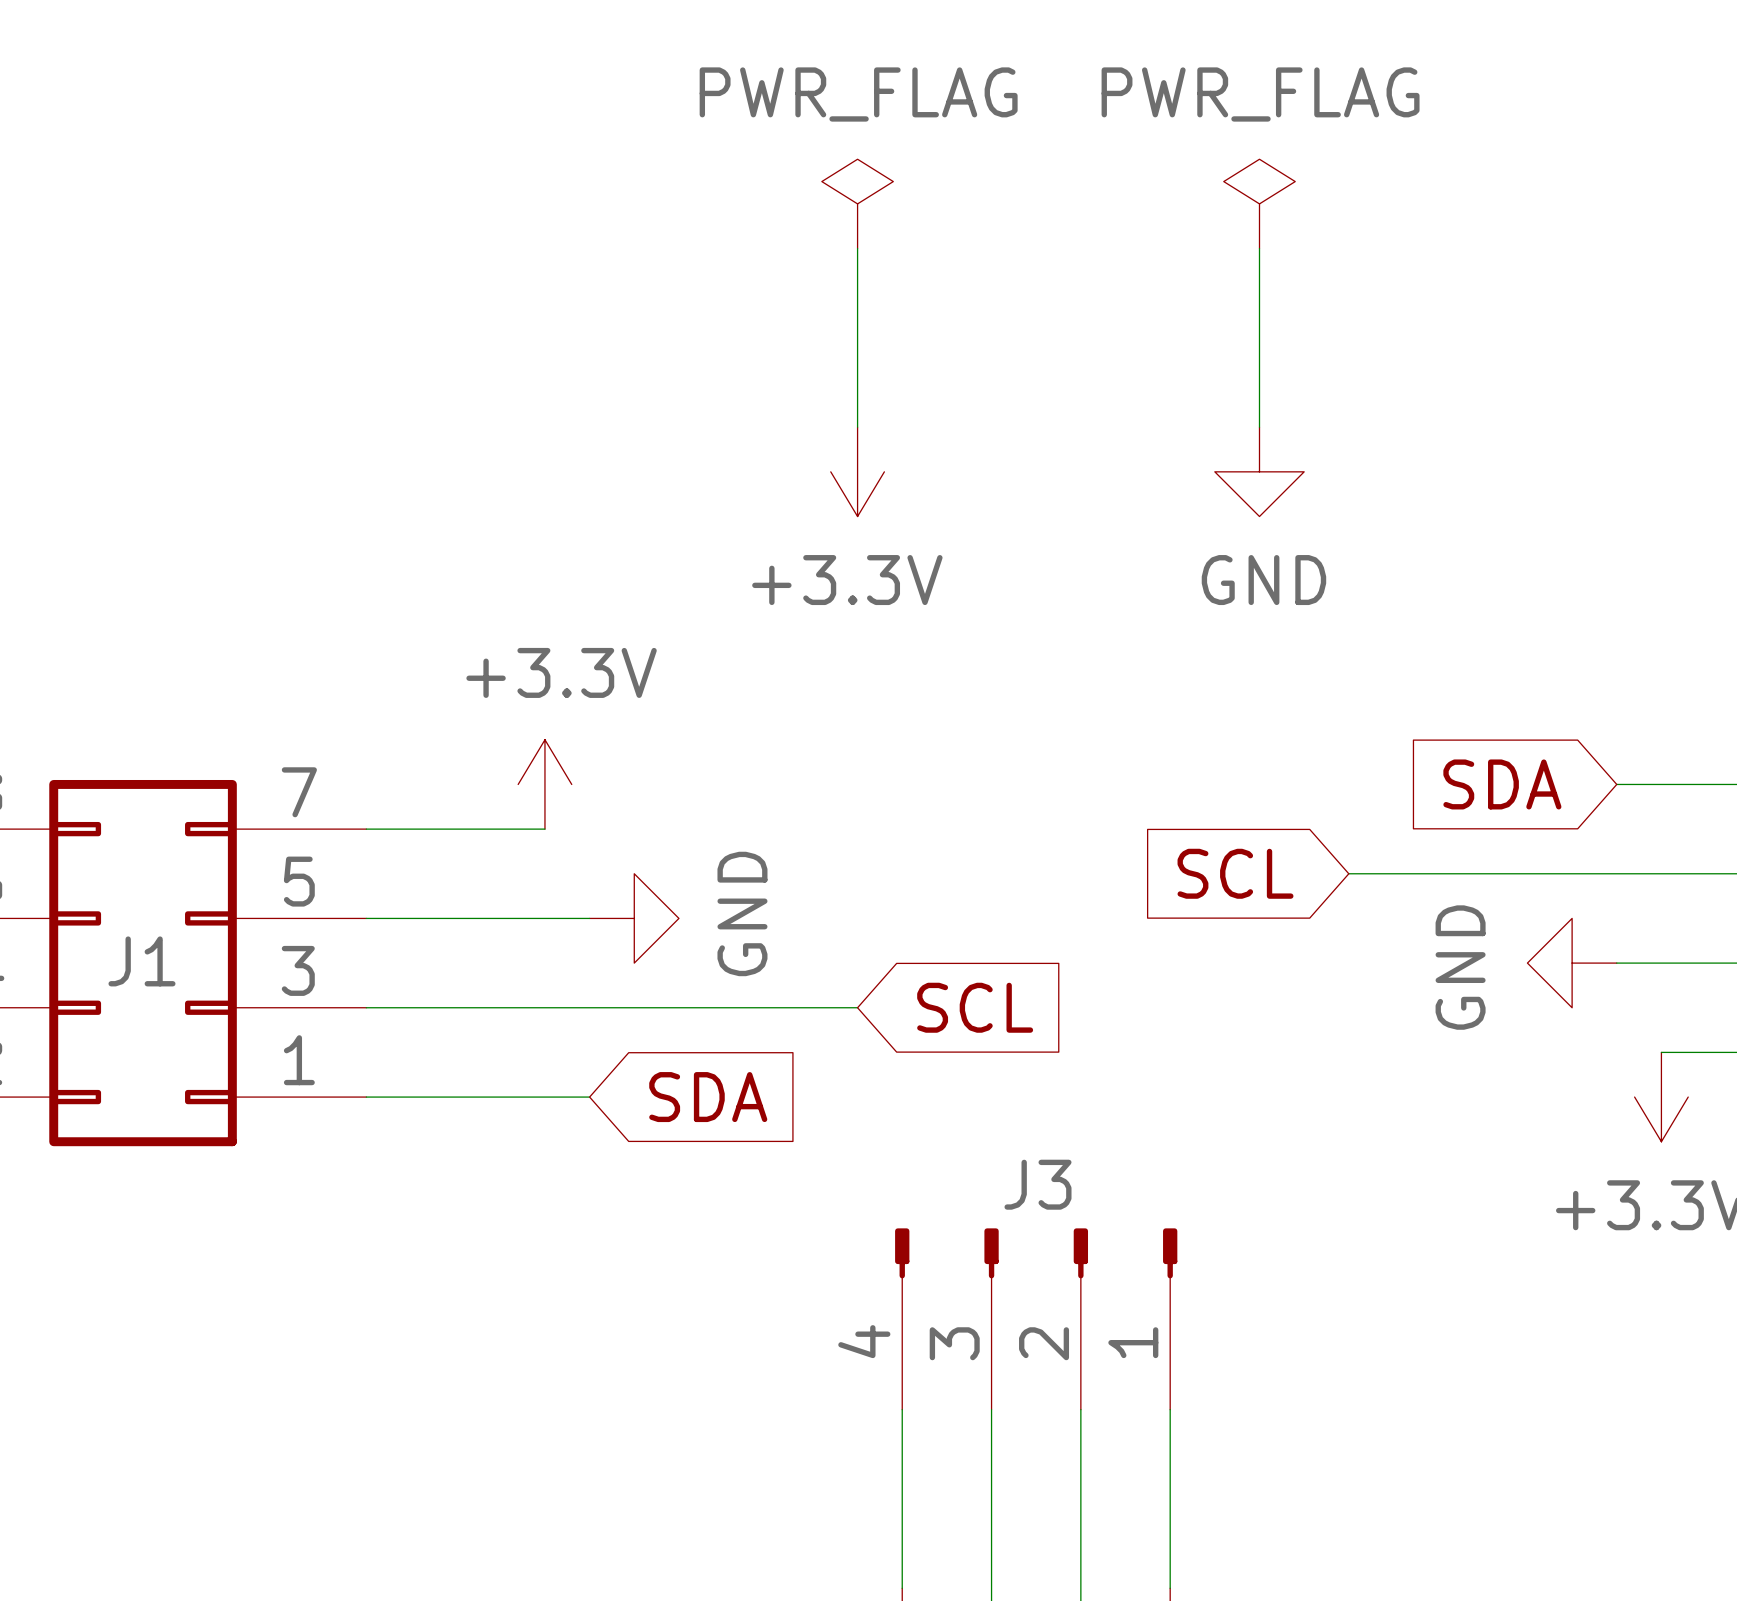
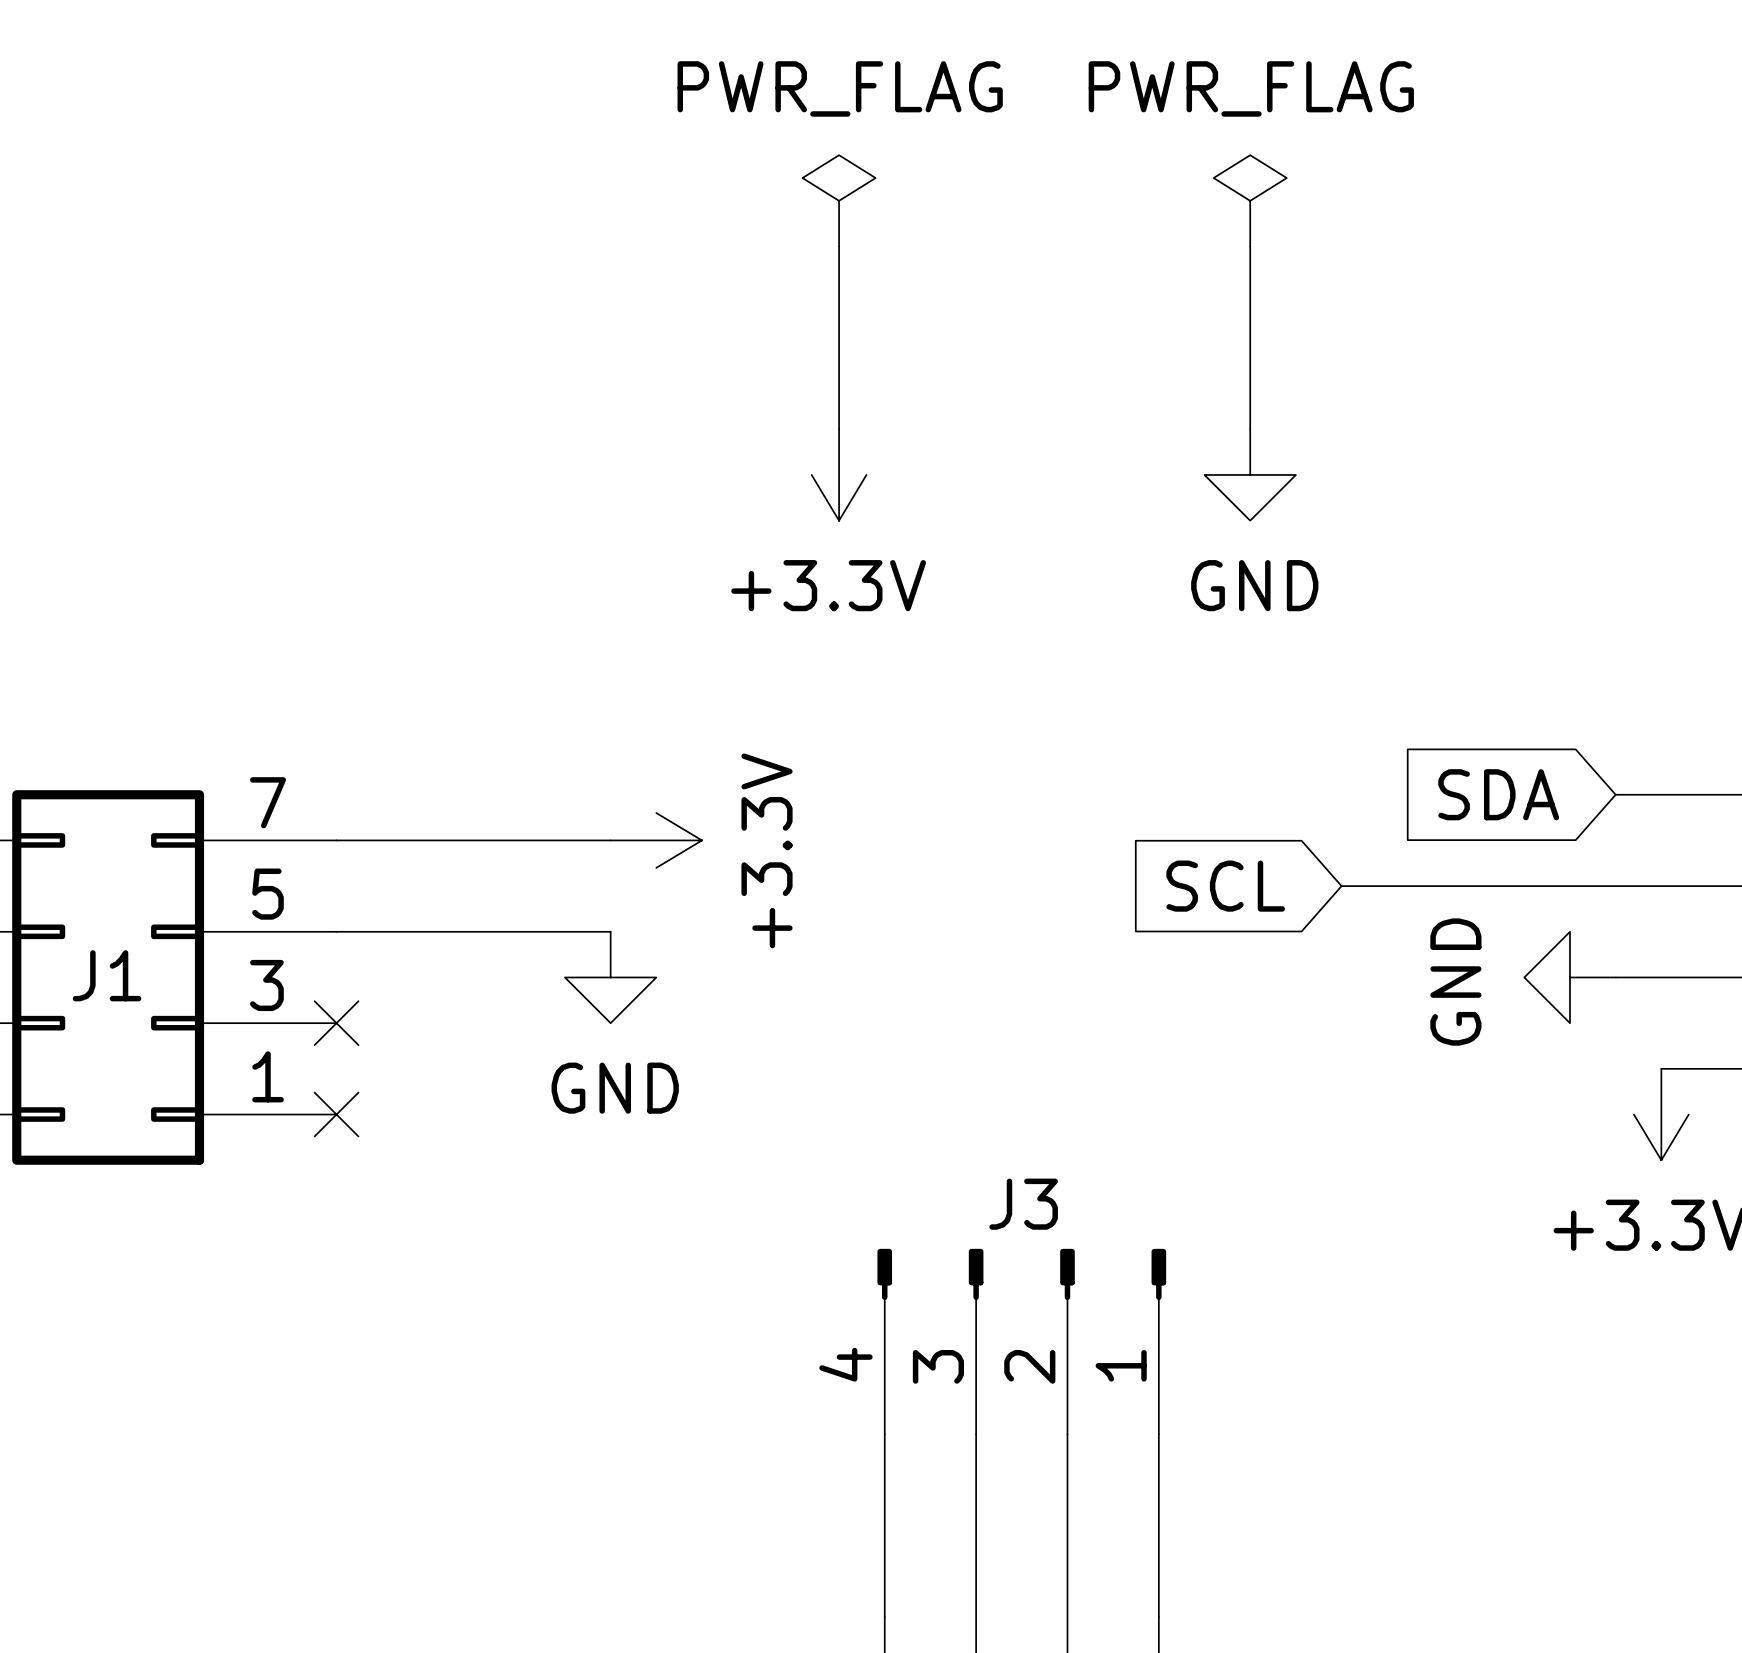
power symbol rotation: 0° (544, 784) -> 90° clockwise (656, 840)
power symbol position: +3.3V (544, 784) -> +3.3V (656, 840)
wire: none -> (519, 840) (610, 840)
power symbol rotation: 0° (634, 918) -> 90° clockwise (610, 977)
wire: (366, 1007) (857, 1007) -> none
no-connect mark: none -> (336, 1023)
global label: SCL (975, 1007) -> none
wire: (366, 1097) (589, 1097) -> none
no-connect mark: none -> (336, 1114)
global label: SDA (708, 1097) -> none

